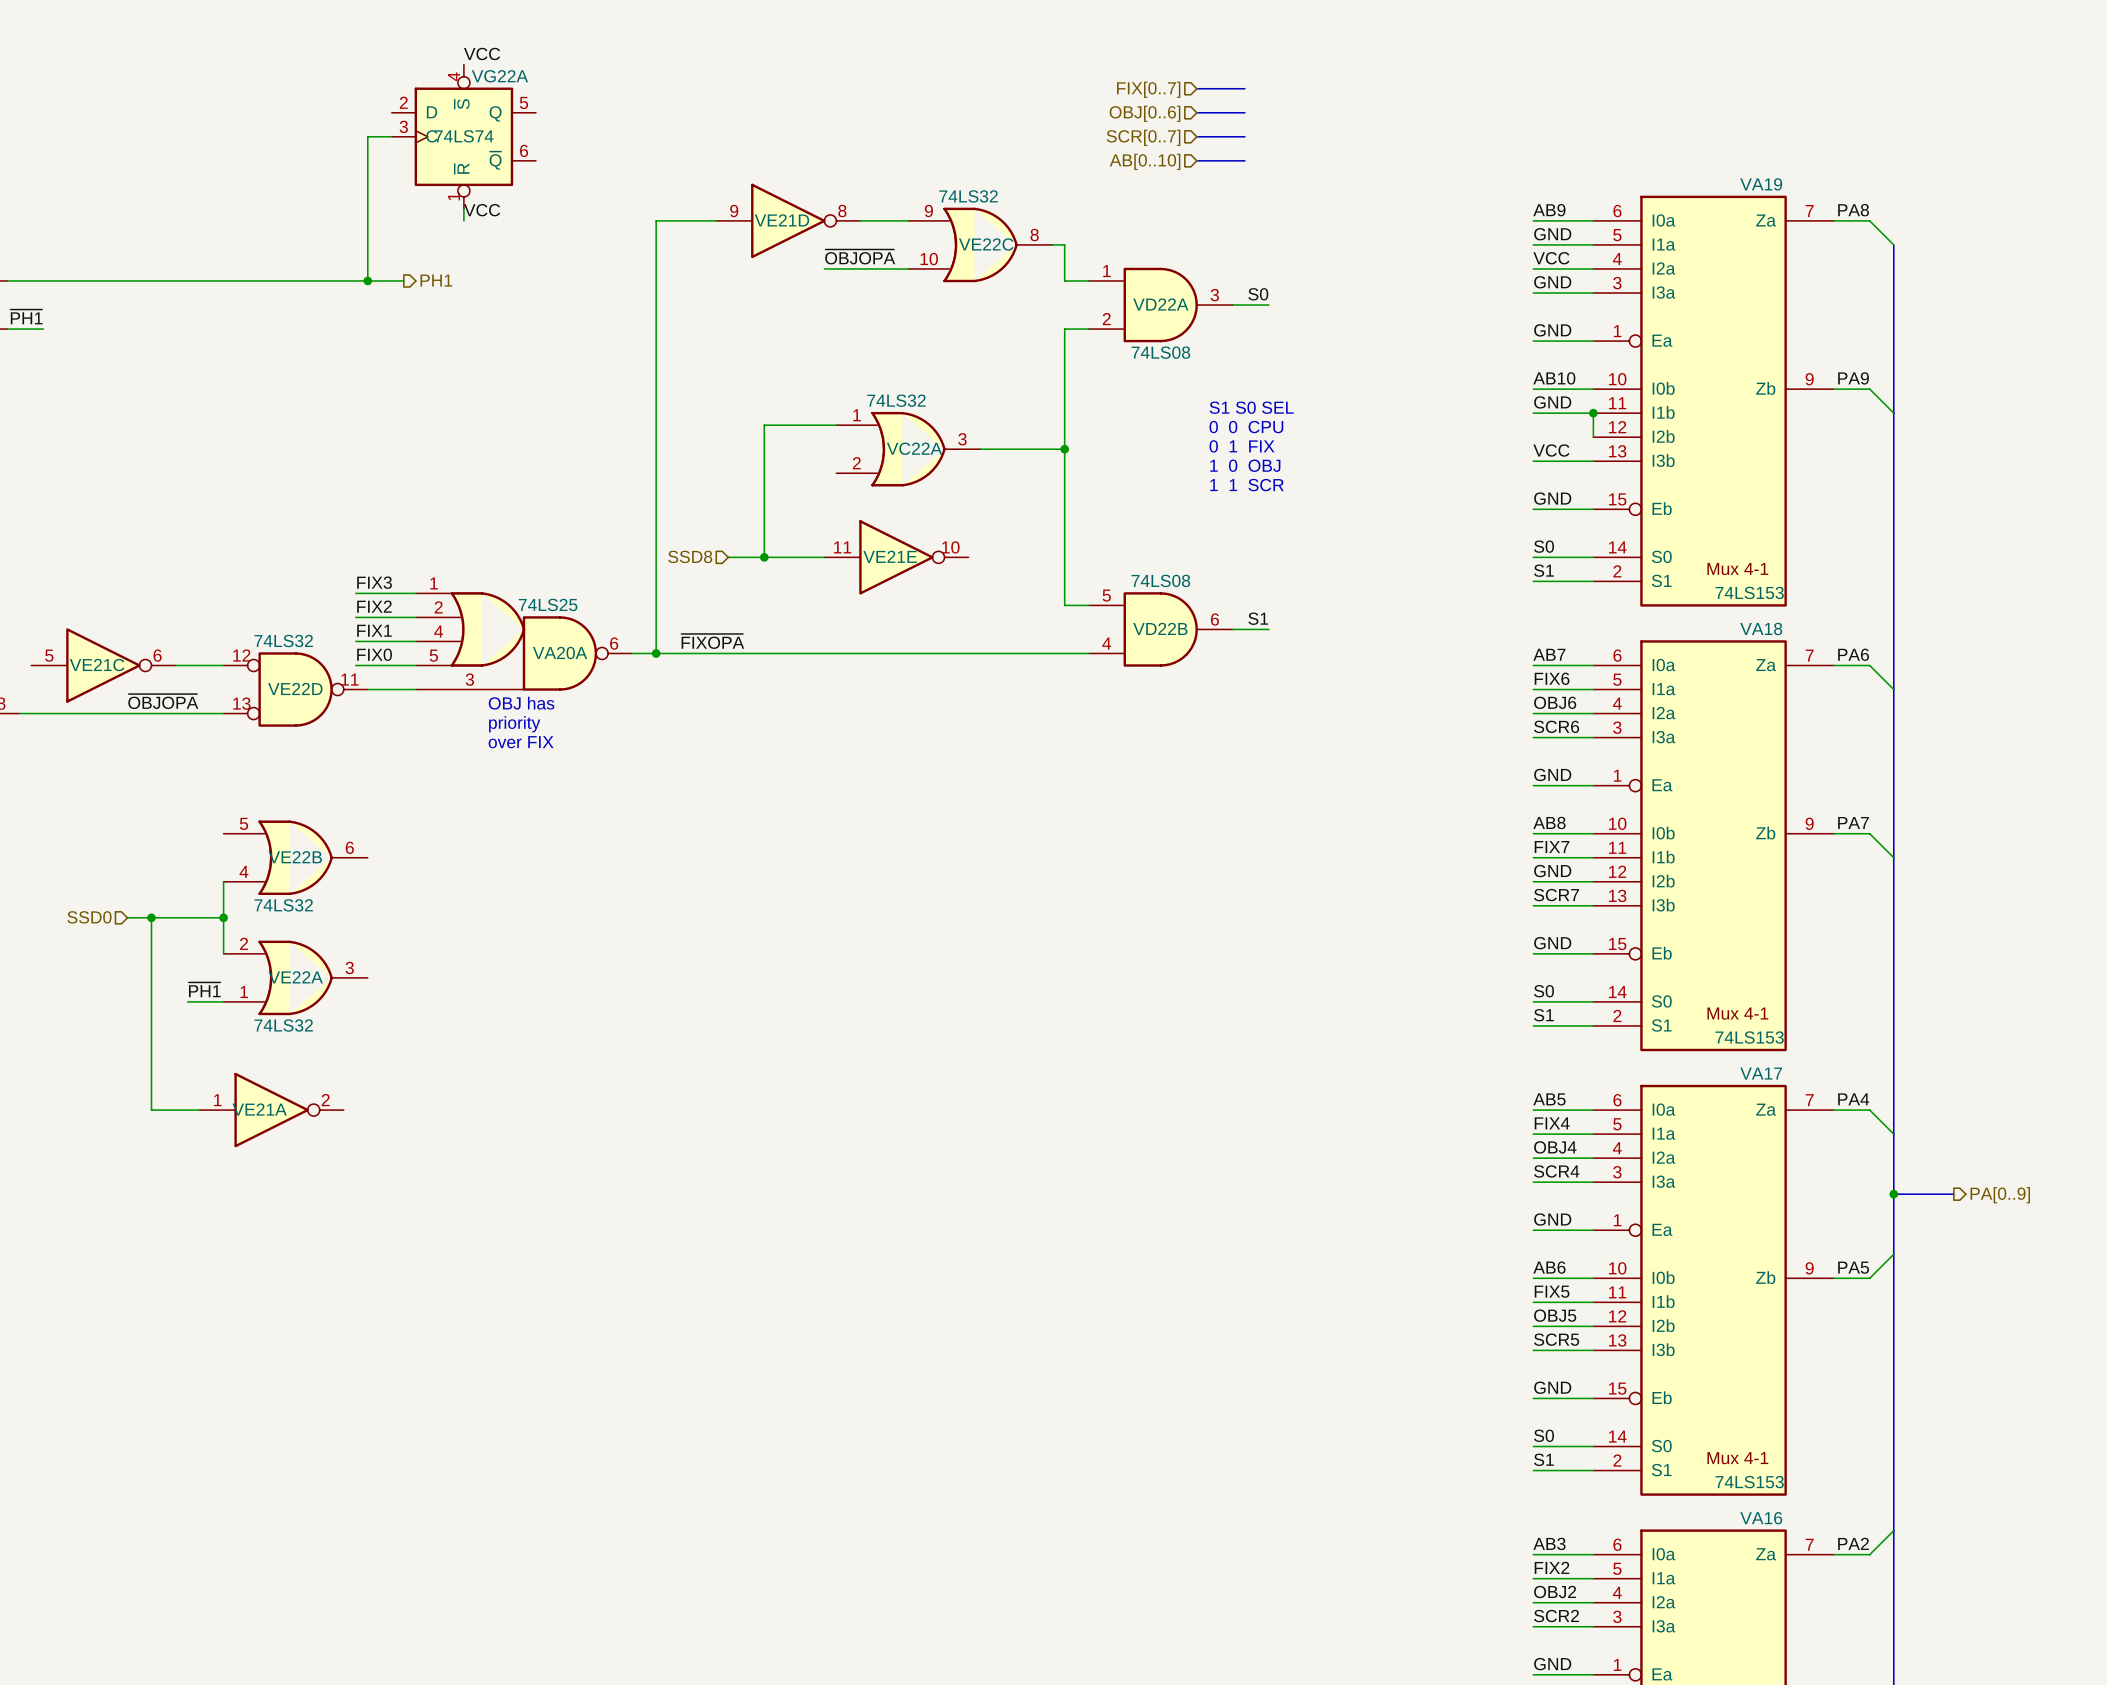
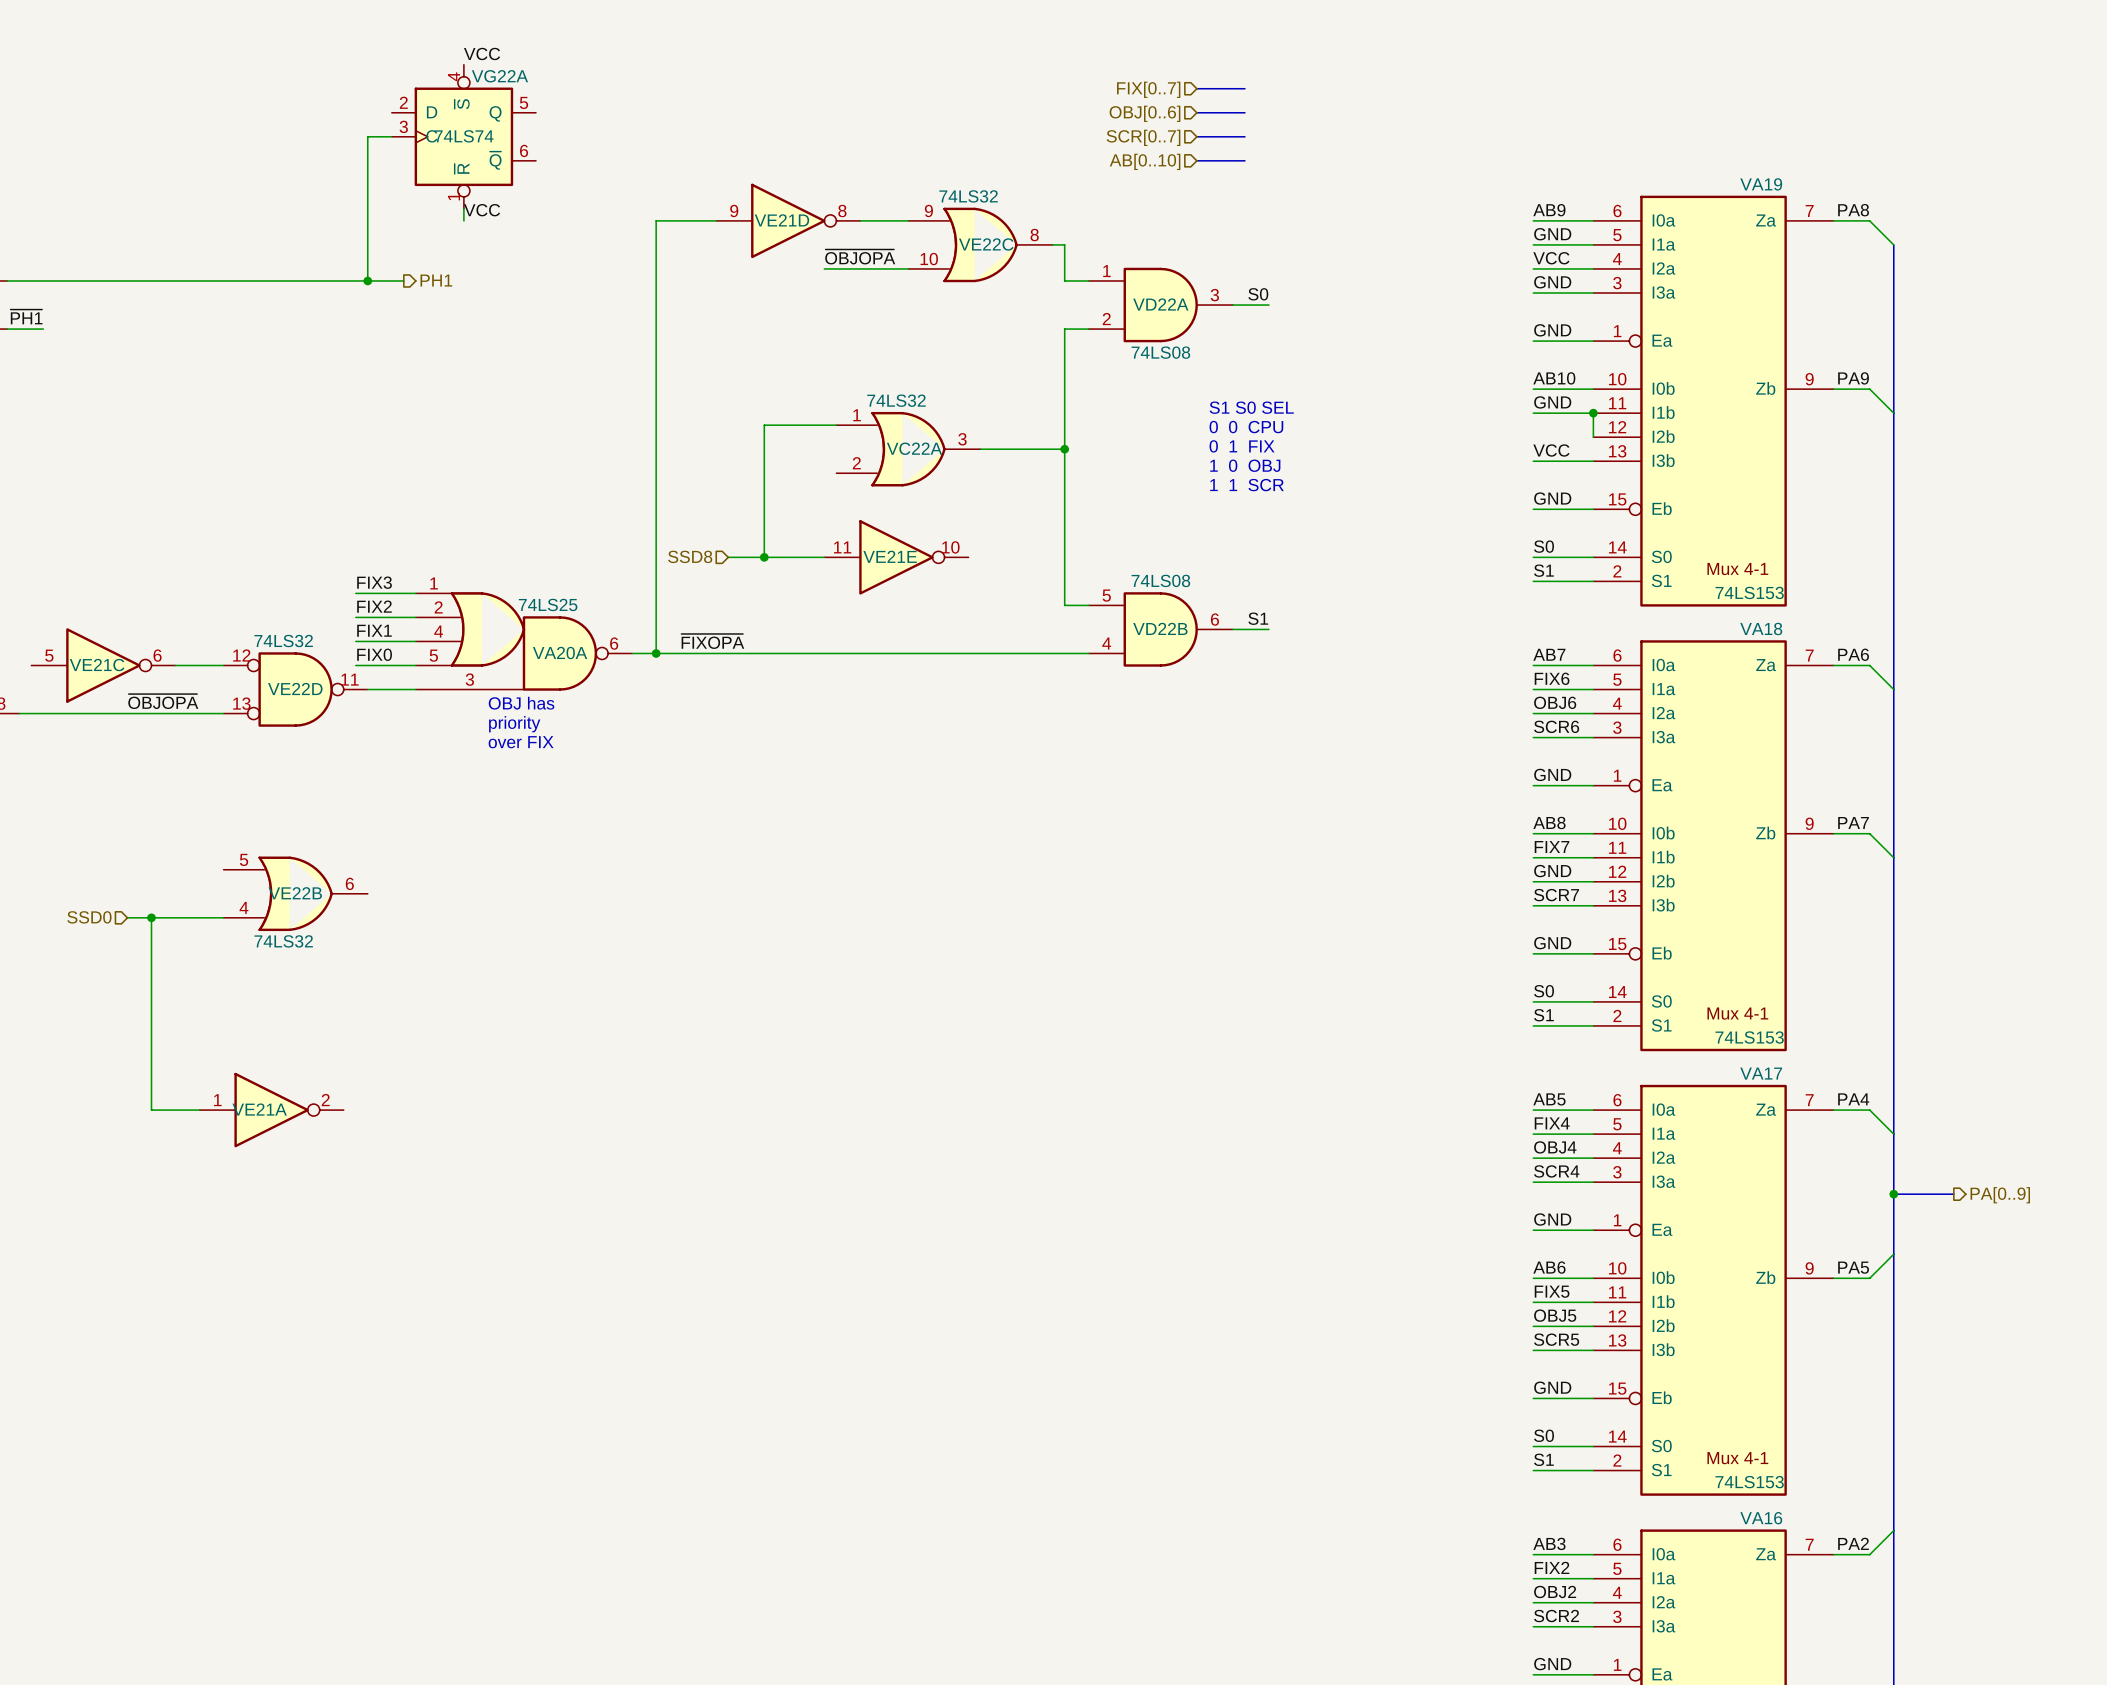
VE22B position: (295, 857) -> (295, 893)
wire: (223, 881) (223, 953) -> none
junction: (223, 917) -> none
VE22A: 74LS32 (295, 977) -> none
label: ~{PH1} (204, 989) -> none
wire: (187, 1001) (223, 1001) -> none

